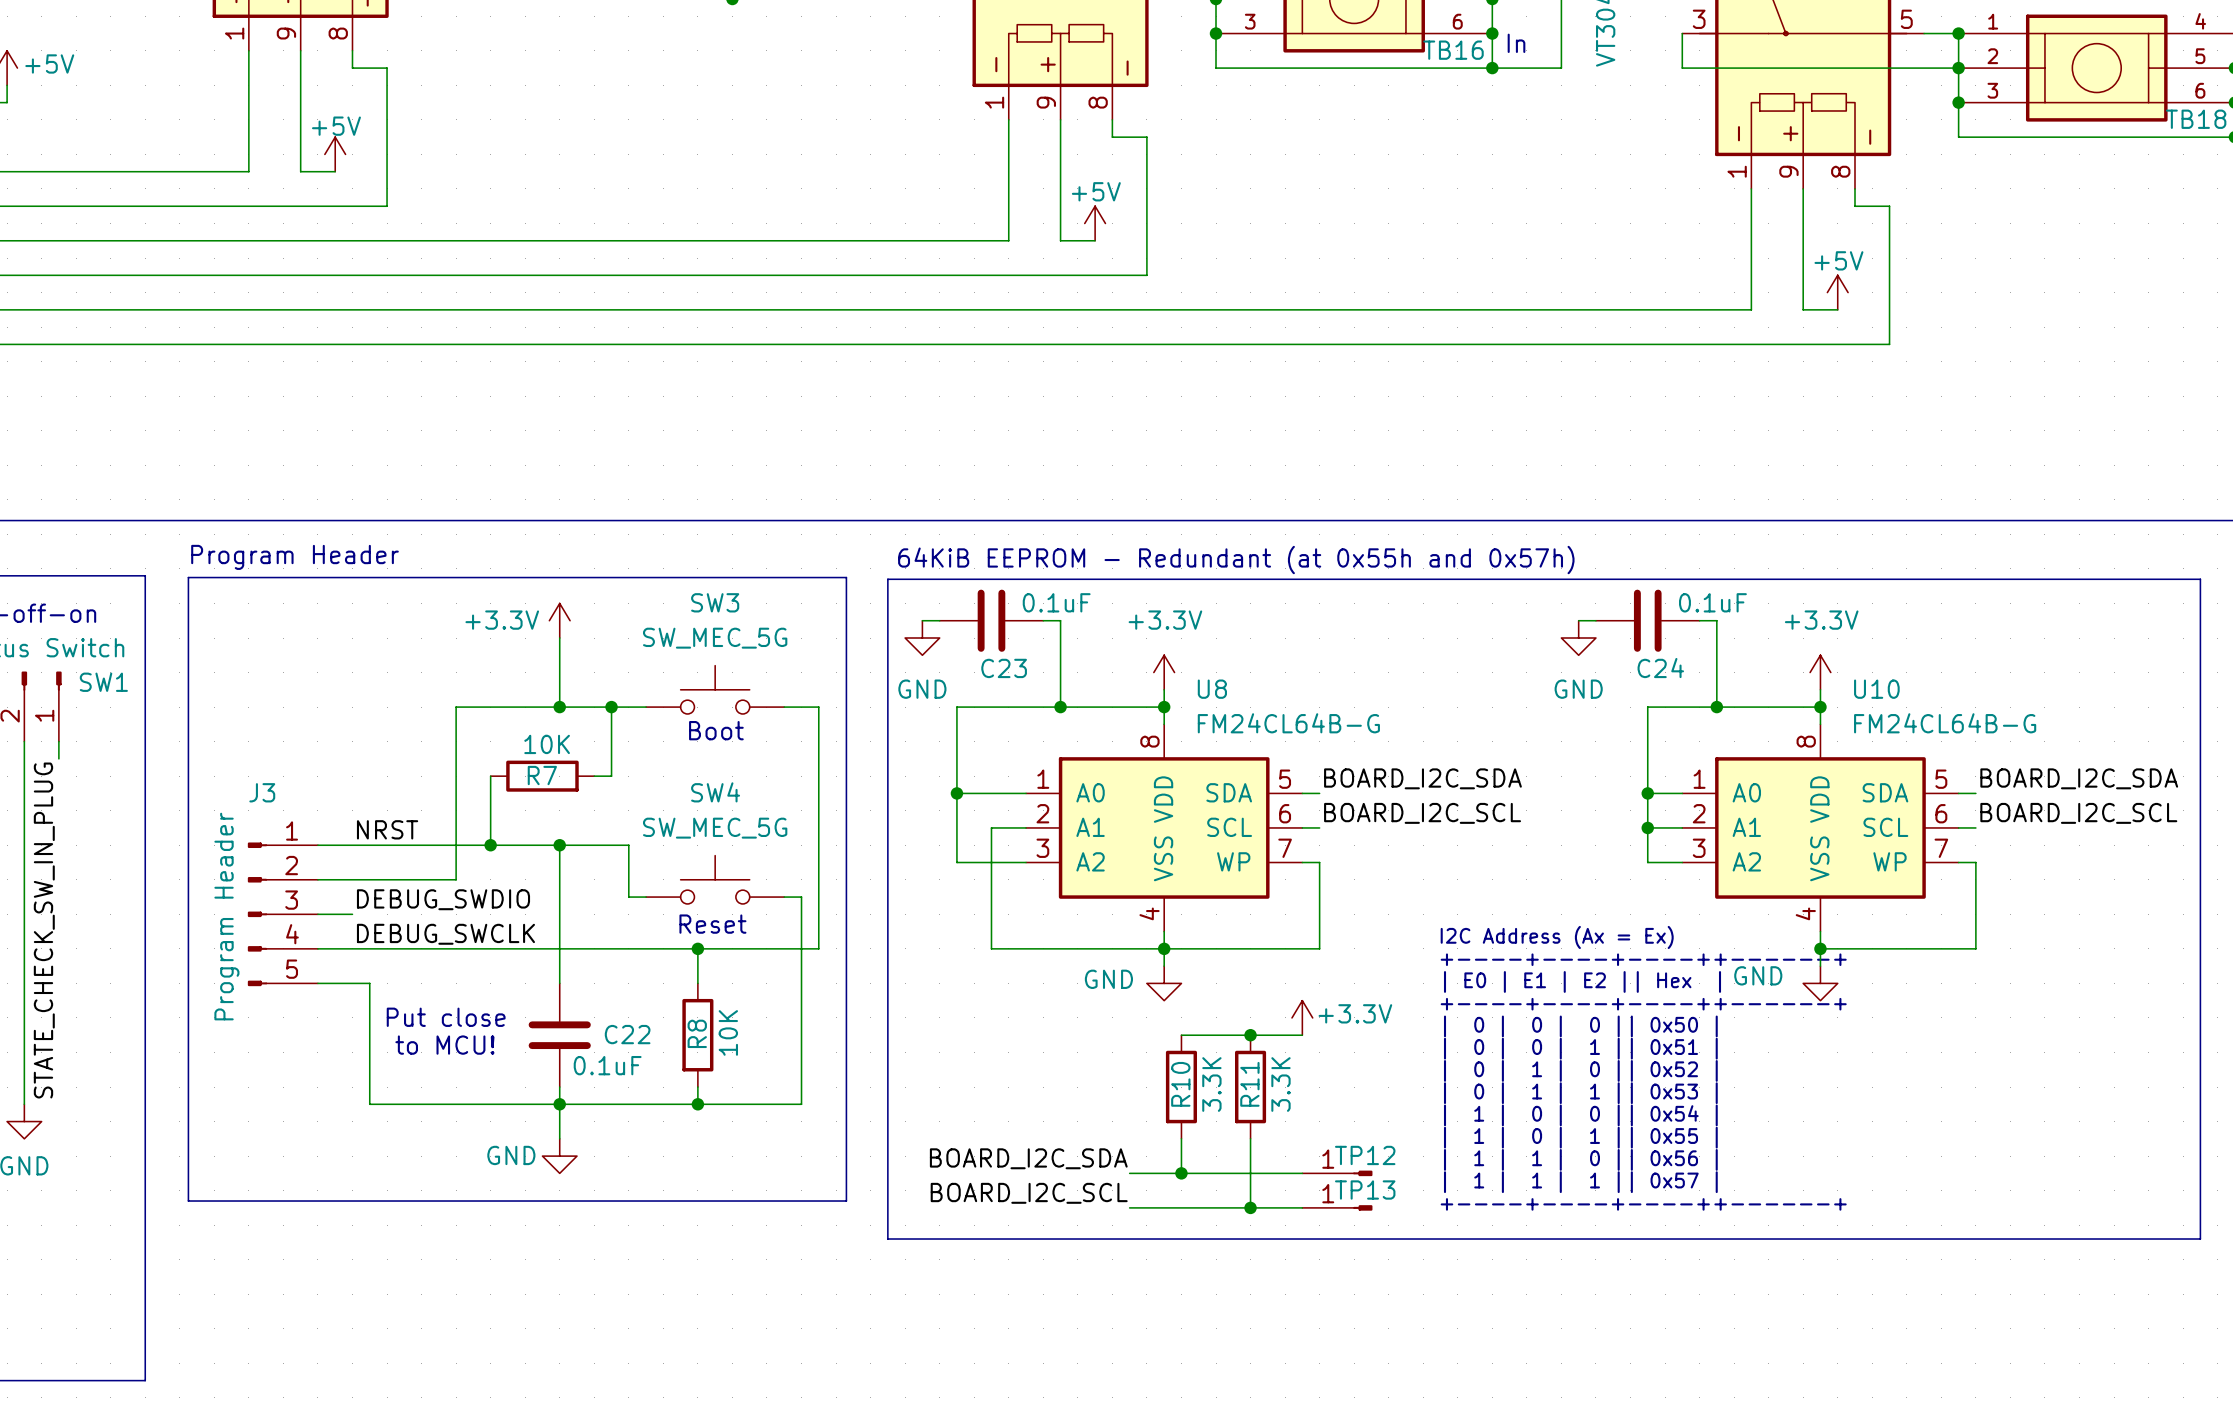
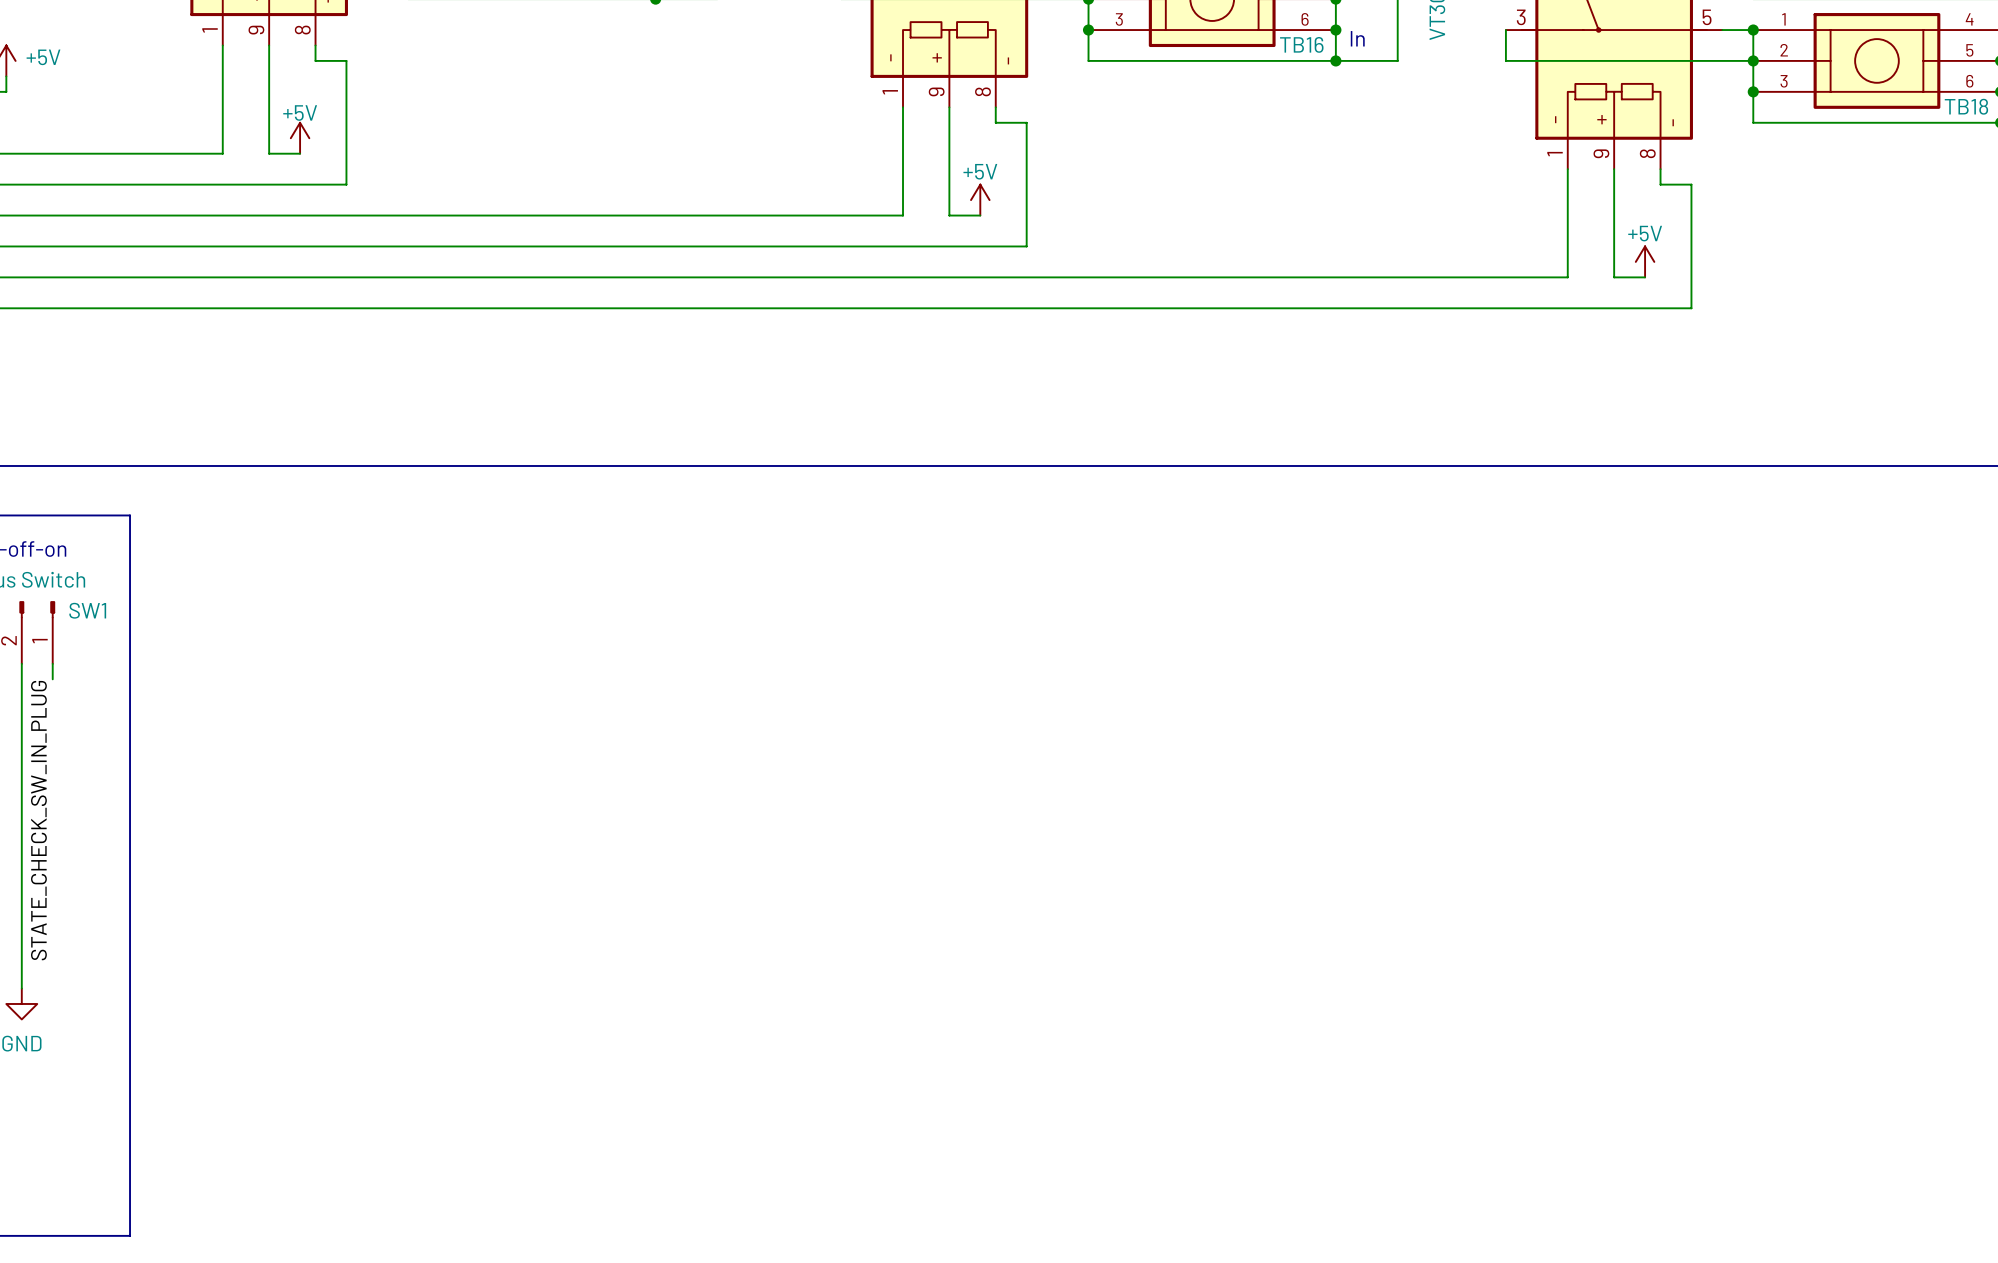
text: Program Header (295, 557) -> none
text: 64KiB EEPROM - Redundant (at 0x55h and 0x57h) (1236, 560) -> none
line: (188, 577) (846, 577) (846, 1201) (188, 1201) (188, 577) -> none
line: (887, 579) (2200, 579) (2200, 1239) (887, 1239) (887, 579) -> none
power symbol: +3.3V (559, 620) -> none
wire: (922, 620) (939, 620) -> none
C23: 0.1uF (991, 620) -> none
wire: (1043, 620) (1060, 620) (1060, 707) -> none
wire: (1578, 620) (1595, 620) -> none
C24: 0.1uF (1647, 620) -> none
wire: (1699, 620) (1716, 620) (1716, 707) -> none
wire: (559, 638) (559, 707) -> none
power symbol: GND (922, 638) -> none
power symbol: GND (1578, 638) -> none
power symbol: +3.3V (1164, 672) -> none
power symbol: +3.3V (1820, 672) -> none
SW3: SW_MEC_5G (715, 689) -> none
wire: (1164, 689) (1164, 724) -> none
wire: (1820, 689) (1820, 724) -> none
junction: (559, 707) -> none
wire: (611, 707) (611, 776) (594, 776) -> none
junction: (611, 707) -> none
wire: (646, 707) (456, 707) (456, 879) (317, 879) -> none
wire: (784, 707) (818, 707) (818, 948) (317, 948) -> none
junction: (1060, 707) -> none
wire: (1164, 707) (956, 707) (956, 862) (1026, 862) -> none
junction: (1164, 707) -> none
junction: (1716, 707) -> none
wire: (1820, 707) (1647, 707) (1647, 862) (1682, 862) -> none
junction: (1820, 707) -> none
text: Boot (716, 730) -> none
wire: (490, 776) (490, 845) -> none
R7: 10K (542, 776) -> none
label: BOARD_I2C_SDA (1422, 778) -> none
label: BOARD_I2C_SDA (2079, 778) -> none
wire: (956, 793) (1026, 793) -> none
junction: (956, 793) -> none
wire: (1302, 793) (1319, 793) -> none
wire: (1647, 793) (1682, 793) -> none
junction: (1647, 793) -> none
wire: (1958, 793) (1975, 793) -> none
label: BOARD_I2C_SCL (1422, 813) -> none
label: BOARD_I2C_SCL (2078, 813) -> none
wire: (1026, 827) (991, 827) (991, 948) (1319, 948) (1319, 862) (1302, 862) -> none
U8: FM24CL64B-G (1164, 827) -> none
wire: (1302, 827) (1319, 827) -> none
wire: (1647, 827) (1682, 827) -> none
junction: (1647, 827) -> none
U10: FM24CL64B-G (1820, 827) -> none
wire: (1958, 827) (1975, 827) -> none
label: NRST (387, 829) -> none
wire: (317, 845) (628, 845) (628, 897) (646, 897) -> none
junction: (490, 845) -> none
wire: (559, 845) (559, 983) -> none
junction: (559, 845) -> none
wire: (1958, 862) (1975, 862) (1975, 948) (1820, 948) -> none
SW4: SW_MEC_5G (715, 879) -> none
wire: (784, 897) (801, 897) (801, 1104) (369, 1104) (369, 983) (317, 983) -> none
label: DEBUG_SWDIO (443, 899) -> none
J3: Program Header (282, 914) -> none
wire: (317, 914) (352, 914) -> none
text: Reset (712, 924) -> none
wire: (1164, 931) (1164, 966) -> none
wire: (1820, 931) (1820, 966) -> none
label: DEBUG_SWCLK (445, 934) -> none
text: I2C Address (Ax = Ex) (1557, 937) -> none
wire: (697, 948) (697, 983) -> none
junction: (697, 948) -> none
junction: (1164, 948) -> none
junction: (1820, 948) -> none
text: +----+----+----++------+ (1643, 959) -> none
text: | E0 | E1 | E2 || Hex | (1582, 981) -> none
power symbol: GND (1164, 983) -> none
power symbol: GND (1820, 983) -> none
text: +----+----+----++------+ (1643, 1004) -> none
text: Put close (446, 1017) -> none
power symbol: +3.3V (1302, 1017) -> none
text: | 0 | 0 | 0 || 0x50 | (1580, 1026) -> none
C22: 0.1uF (559, 1035) -> none
R8: 10K (697, 1035) -> none
wire: (1181, 1035) (1302, 1035) -> none
junction: (1250, 1035) -> none
text: to MCU! (444, 1045) -> none
text: | 0 | 0 | 1 || 0x51 | (1580, 1048) -> none
text: | 0 | 1 | 0 || 0x52 | (1580, 1070) -> none
wire: (559, 1087) (559, 1138) -> none
wire: (697, 1087) (697, 1104) -> none
R10: 3.3K (1181, 1087) -> none
R11: 3.3K (1250, 1087) -> none
text: | 0 | 1 | 1 || 0x53 | (1580, 1093) -> none
junction: (559, 1104) -> none
junction: (697, 1104) -> none
text: | 1 | 0 | 0 || 0x54 | (1580, 1115) -> none
text: | 1 | 0 | 1 || 0x55 | (1580, 1137) -> none
wire: (1181, 1138) (1181, 1173) -> none
wire: (1250, 1138) (1250, 1207) -> none
power symbol: GND (559, 1156) -> none
label: BOARD_I2C_SDA (1028, 1158) -> none
text: | 1 | 1 | 0 || 0x56 | (1580, 1159) -> none
wire: (1129, 1173) (1302, 1173) -> none
junction: (1181, 1173) -> none
TP12: (1337, 1173) -> none
text: | 1 | 1 | 1 || 0x57 | (1580, 1182) -> none
label: BOARD_I2C_SCL (1029, 1193) -> none
text: +----+----+----++------+ (1643, 1204) -> none
wire: (1129, 1207) (1302, 1207) -> none
junction: (1250, 1207) -> none
TP13: (1337, 1207) -> none

